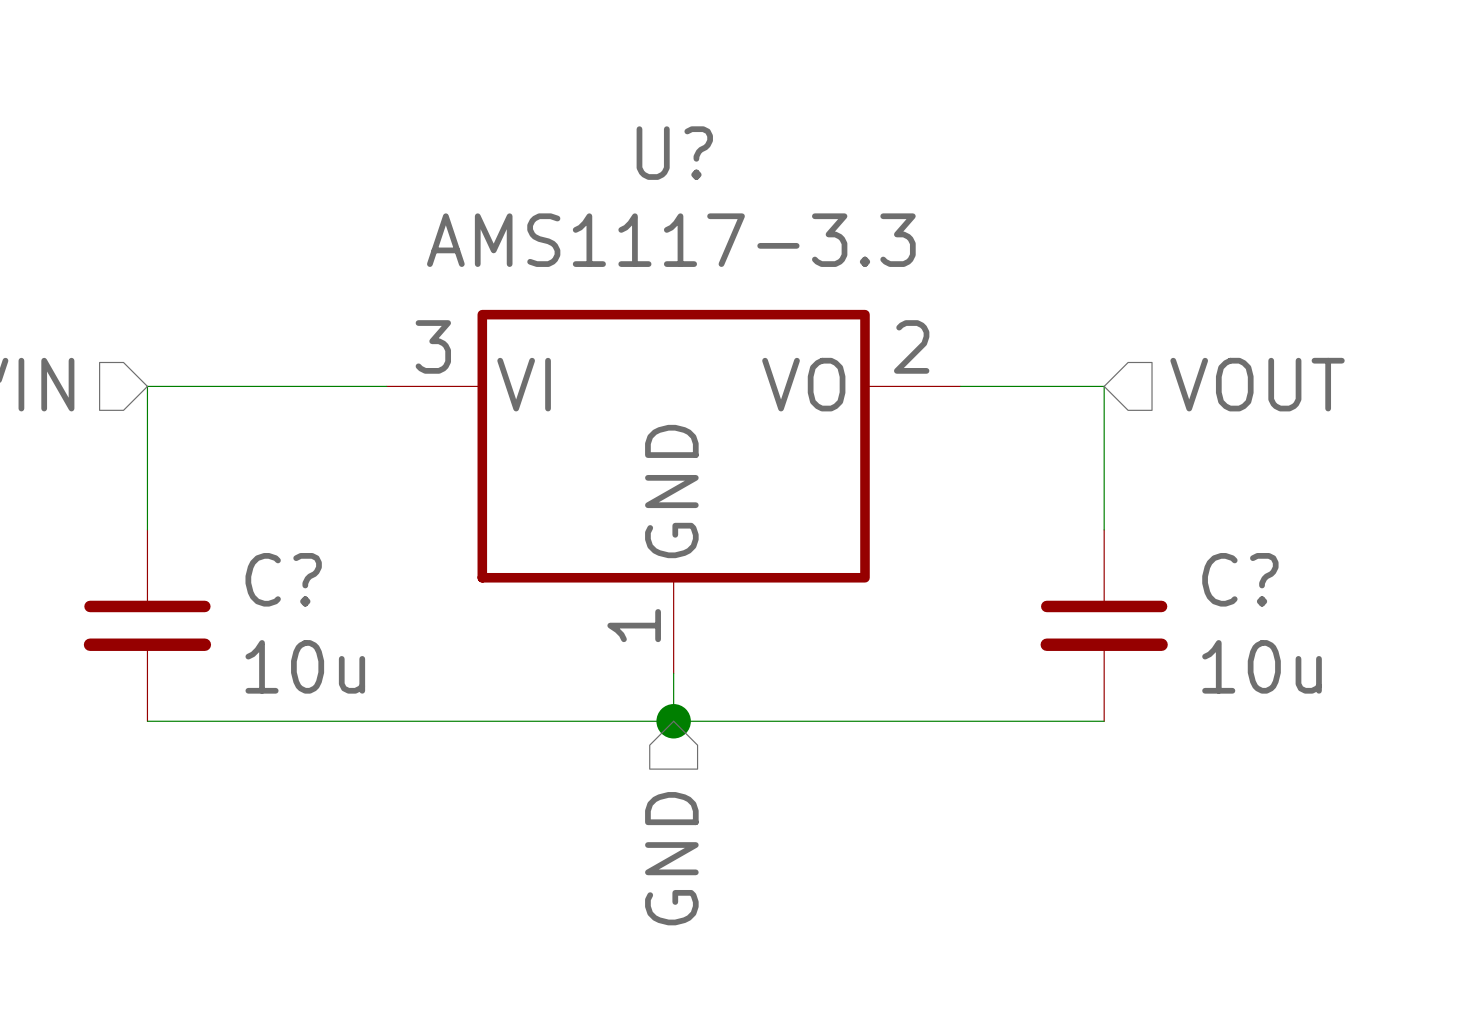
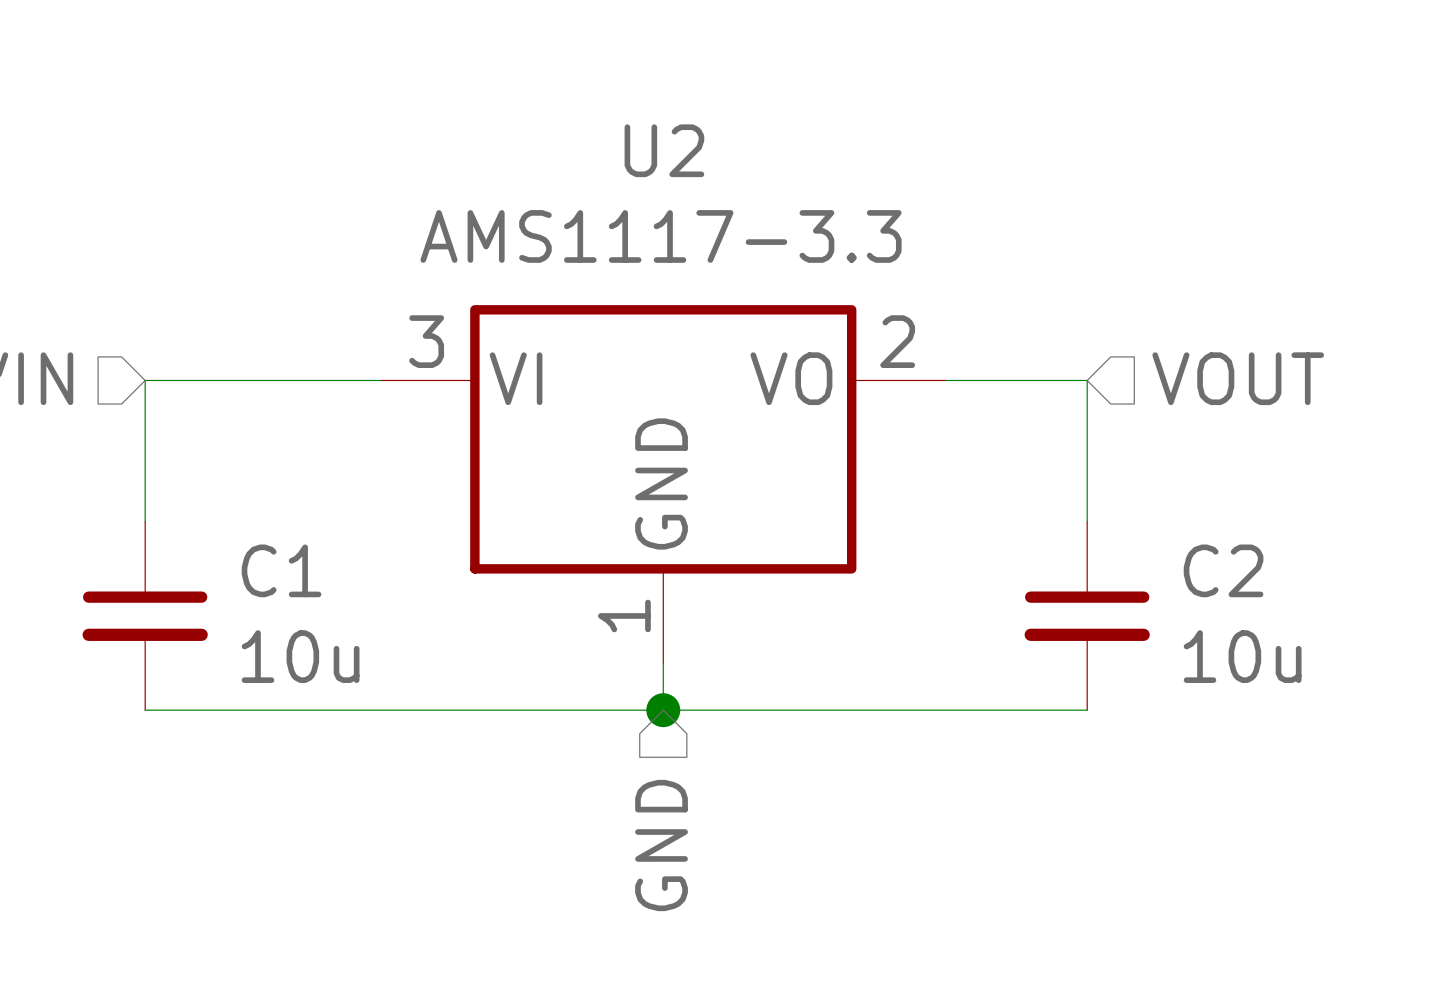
U? name: U? (674, 153) -> U2 (664, 150)
C? name: C? (283, 579) -> C1 (281, 570)
C? name: C? (1240, 579) -> C2 (1223, 570)

